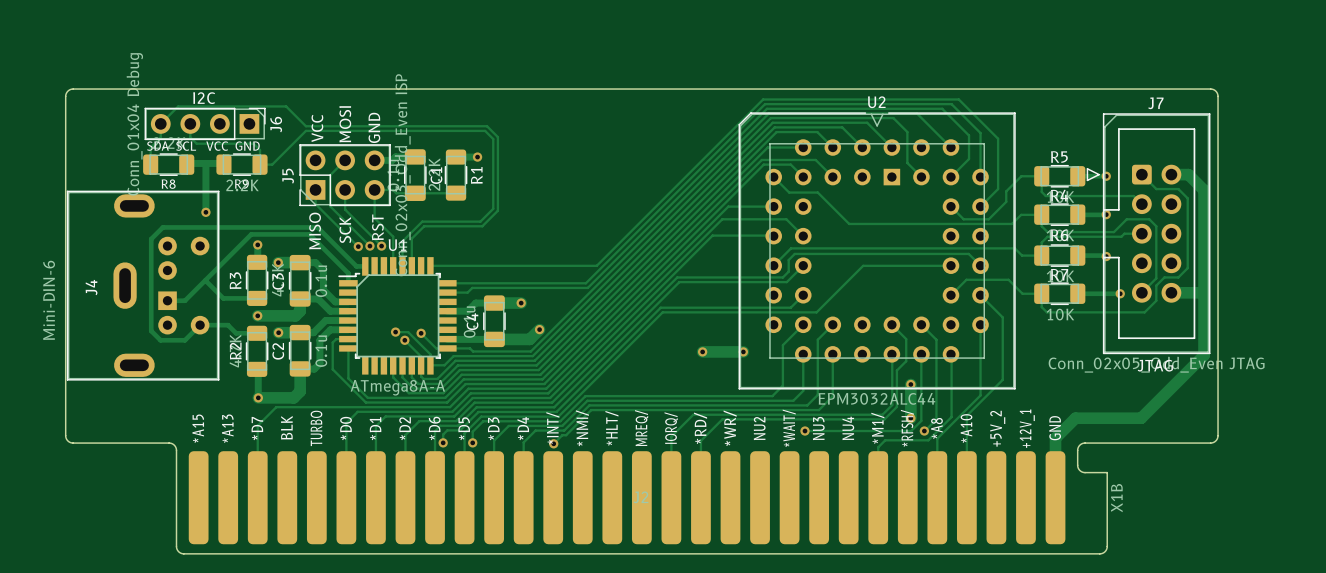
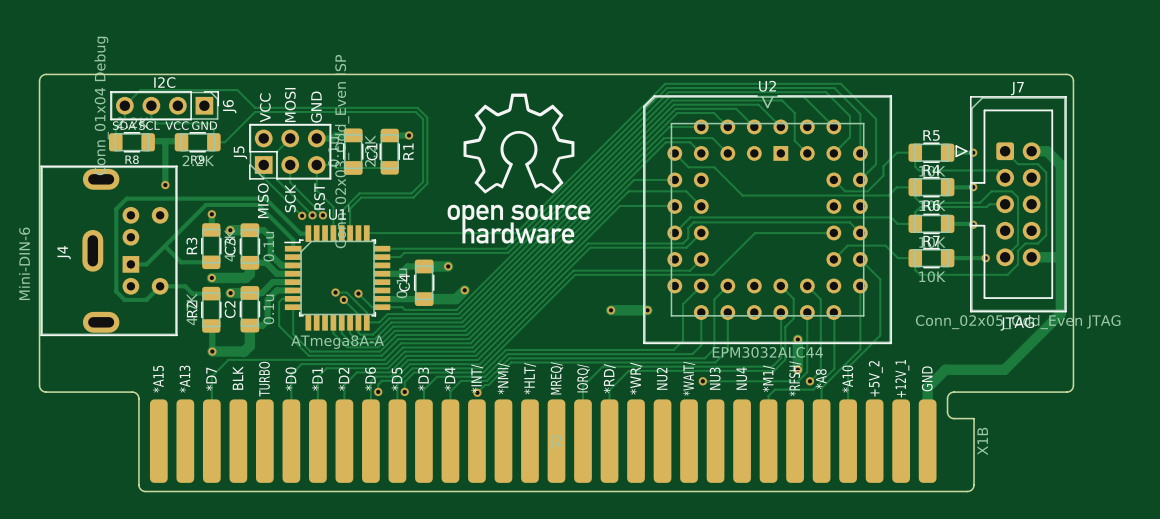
drawing: none -> [447, 93, 591, 244]

